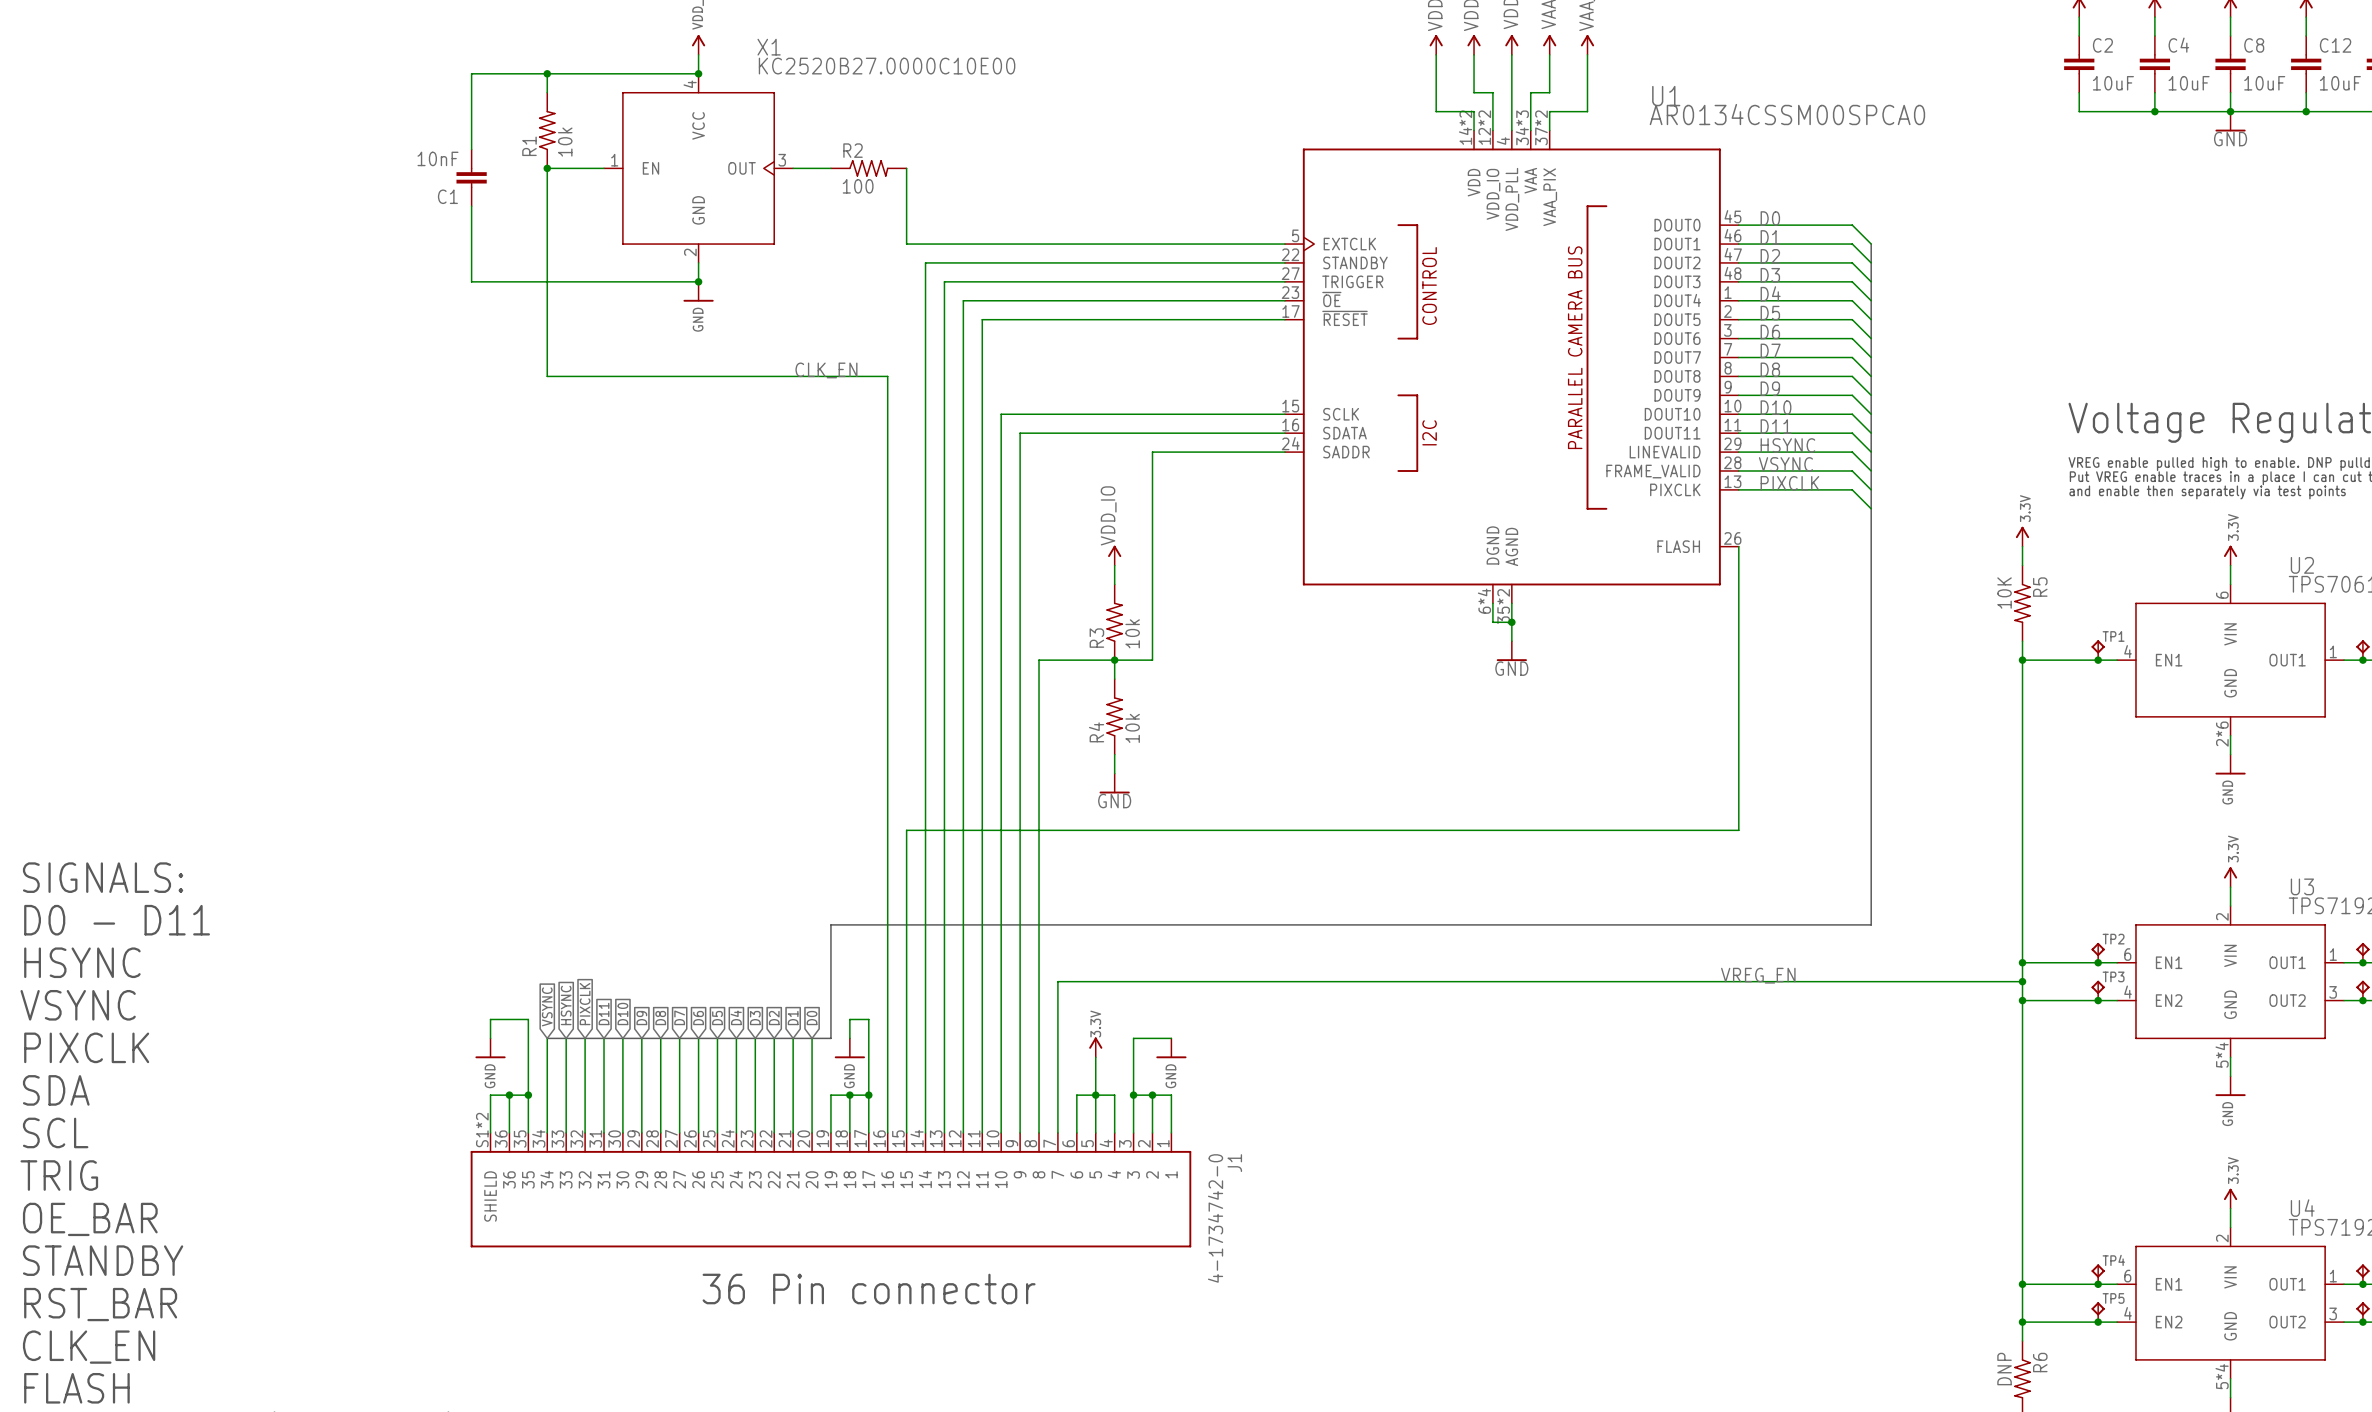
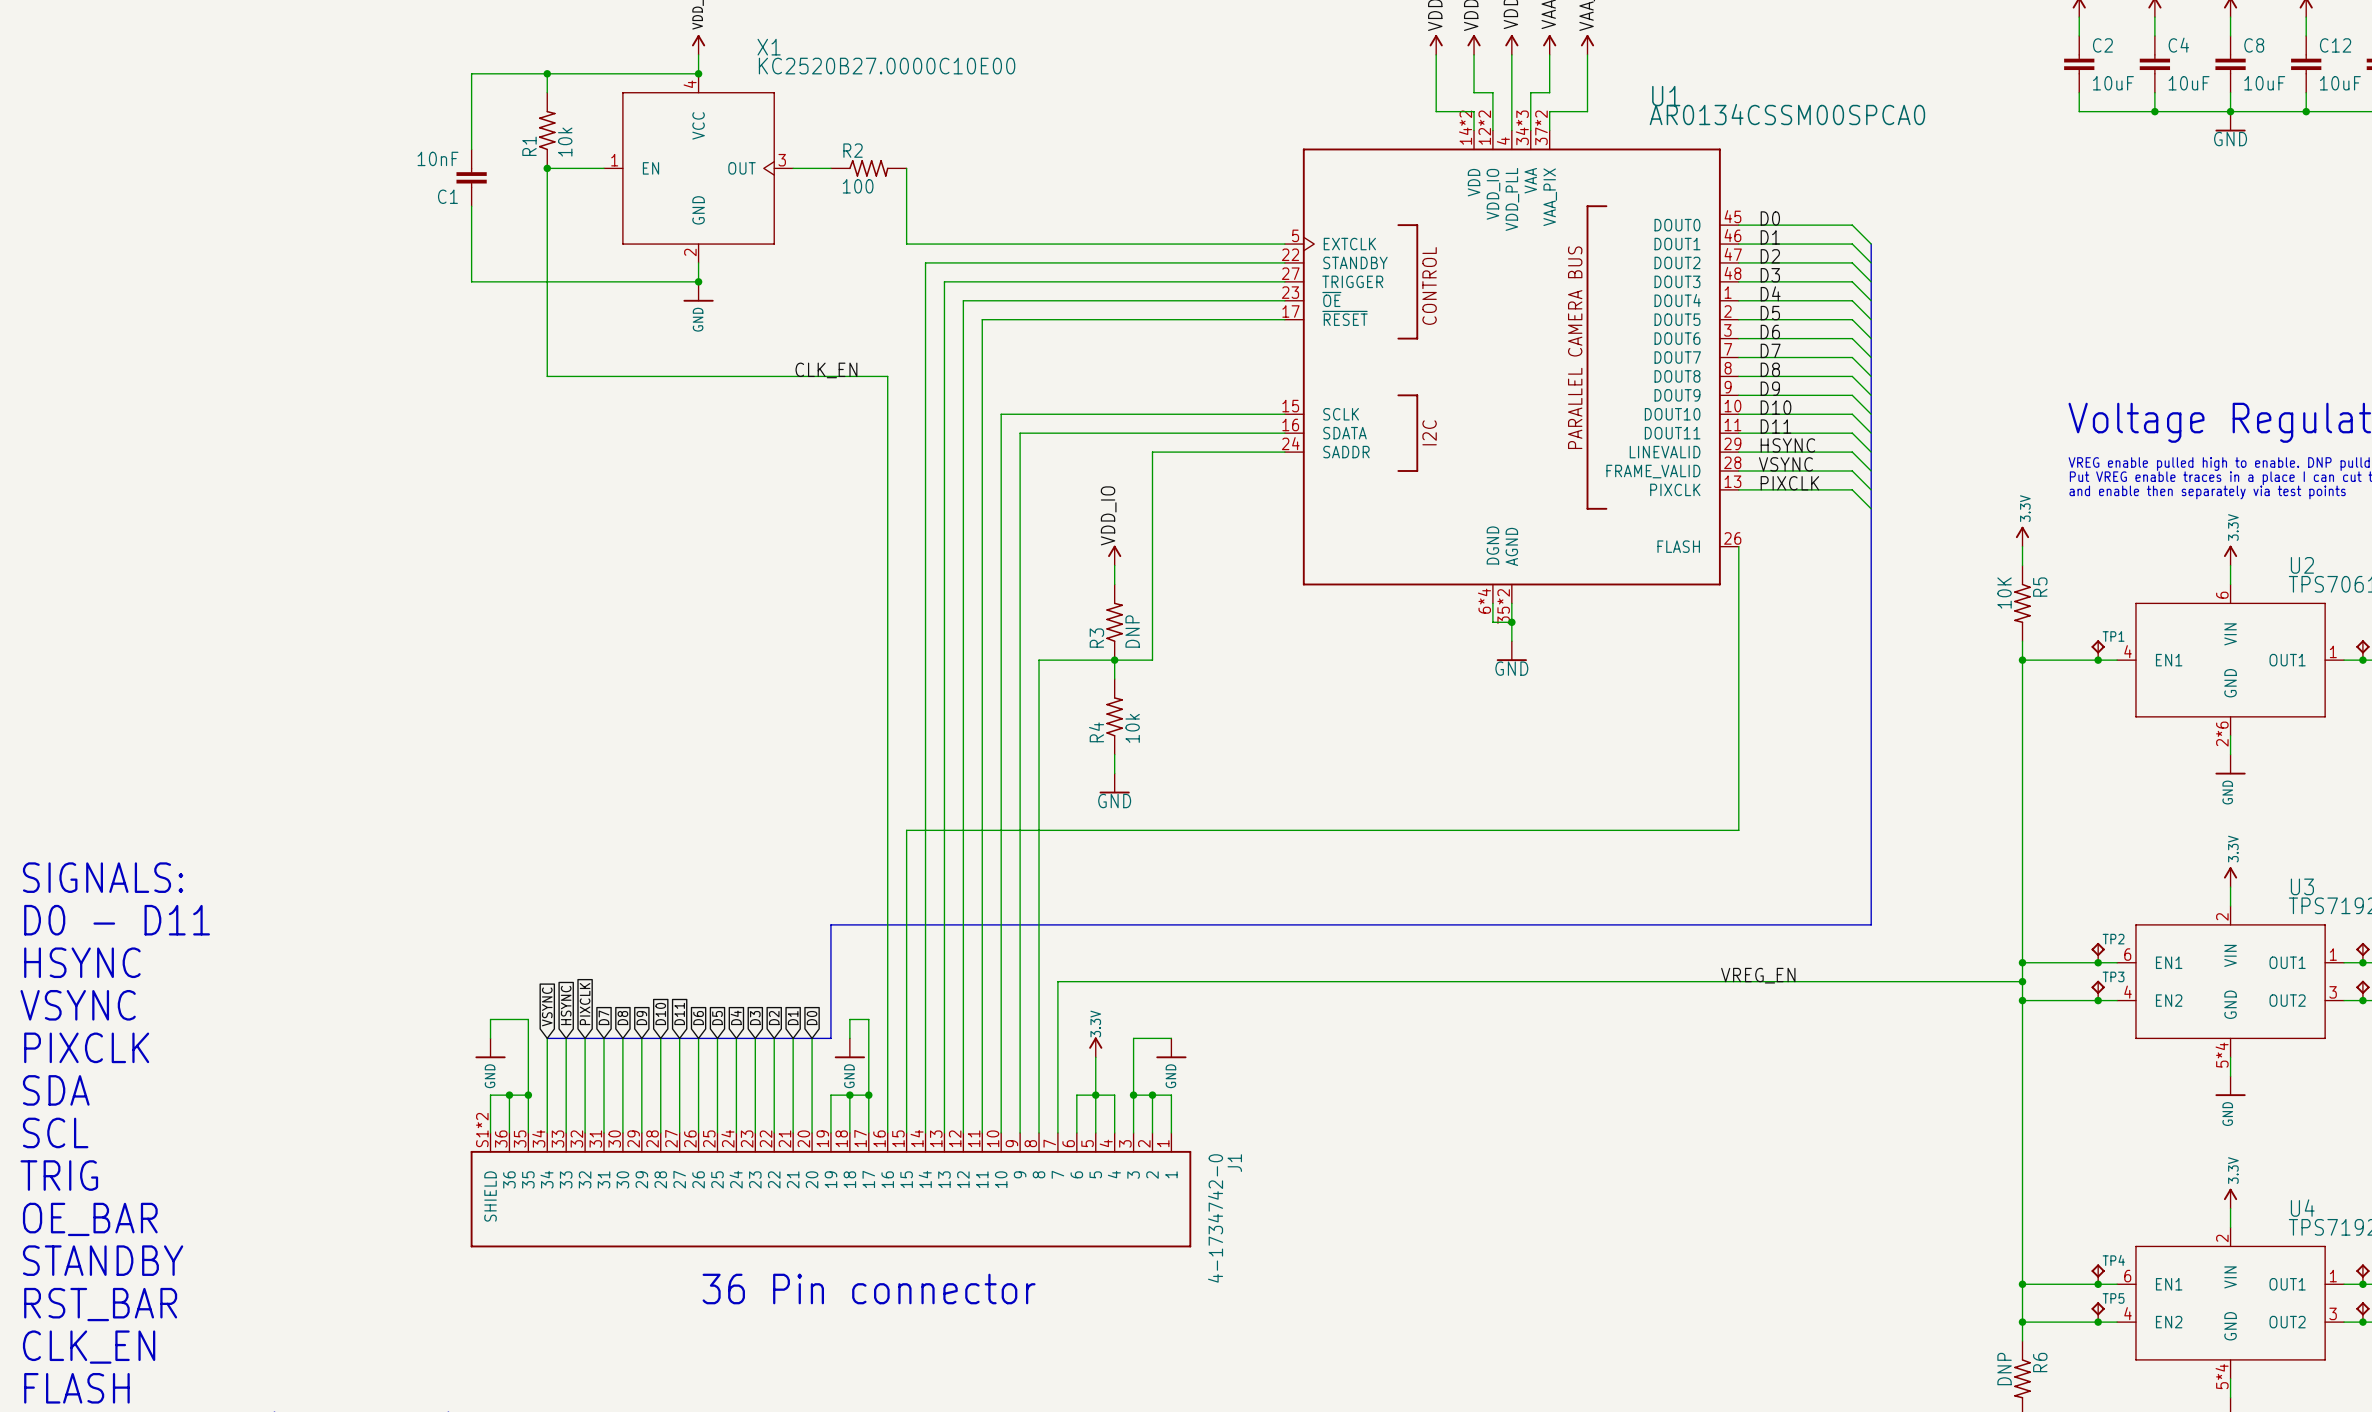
R3 value: 10k (1132, 633) -> DNP (1132, 631)
global label: D11 (604, 1013) -> D7 (604, 1017)
global label: D10 (622, 1013) -> D8 (622, 1018)
global label: D7 (679, 1017) -> D11 (679, 1013)
global label: D8 (660, 1018) -> D10 (660, 1013)

